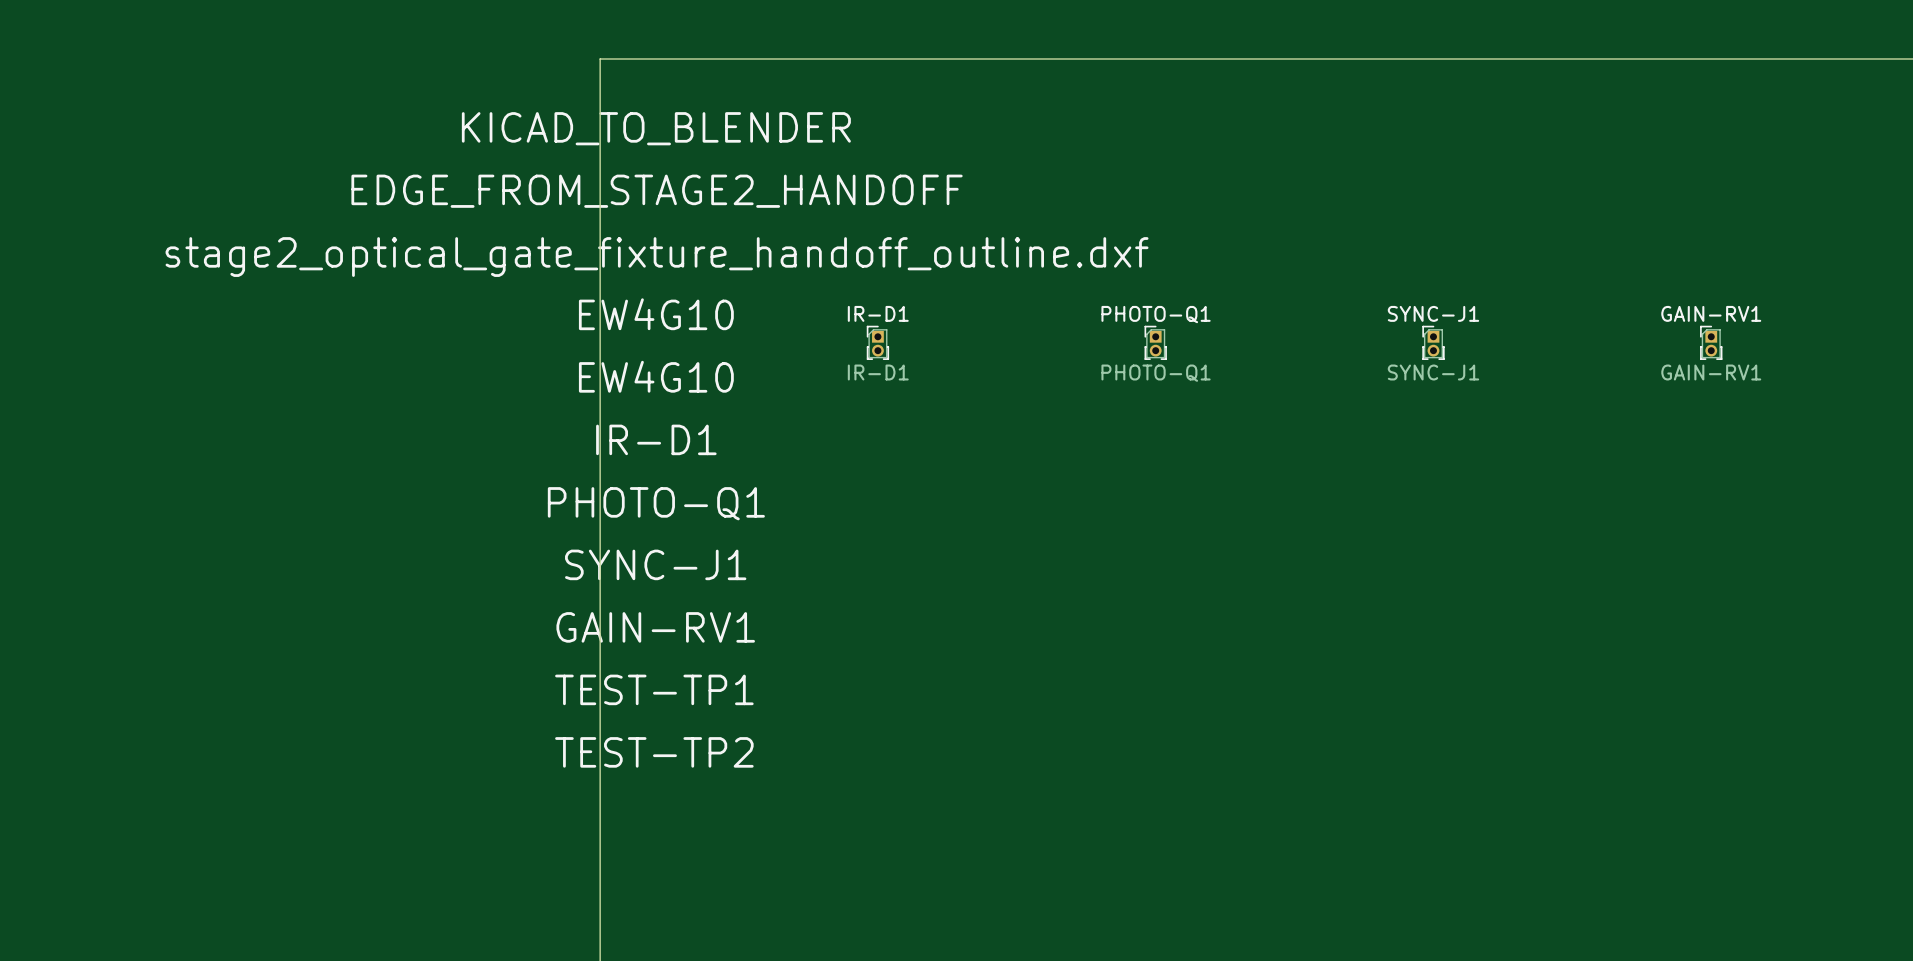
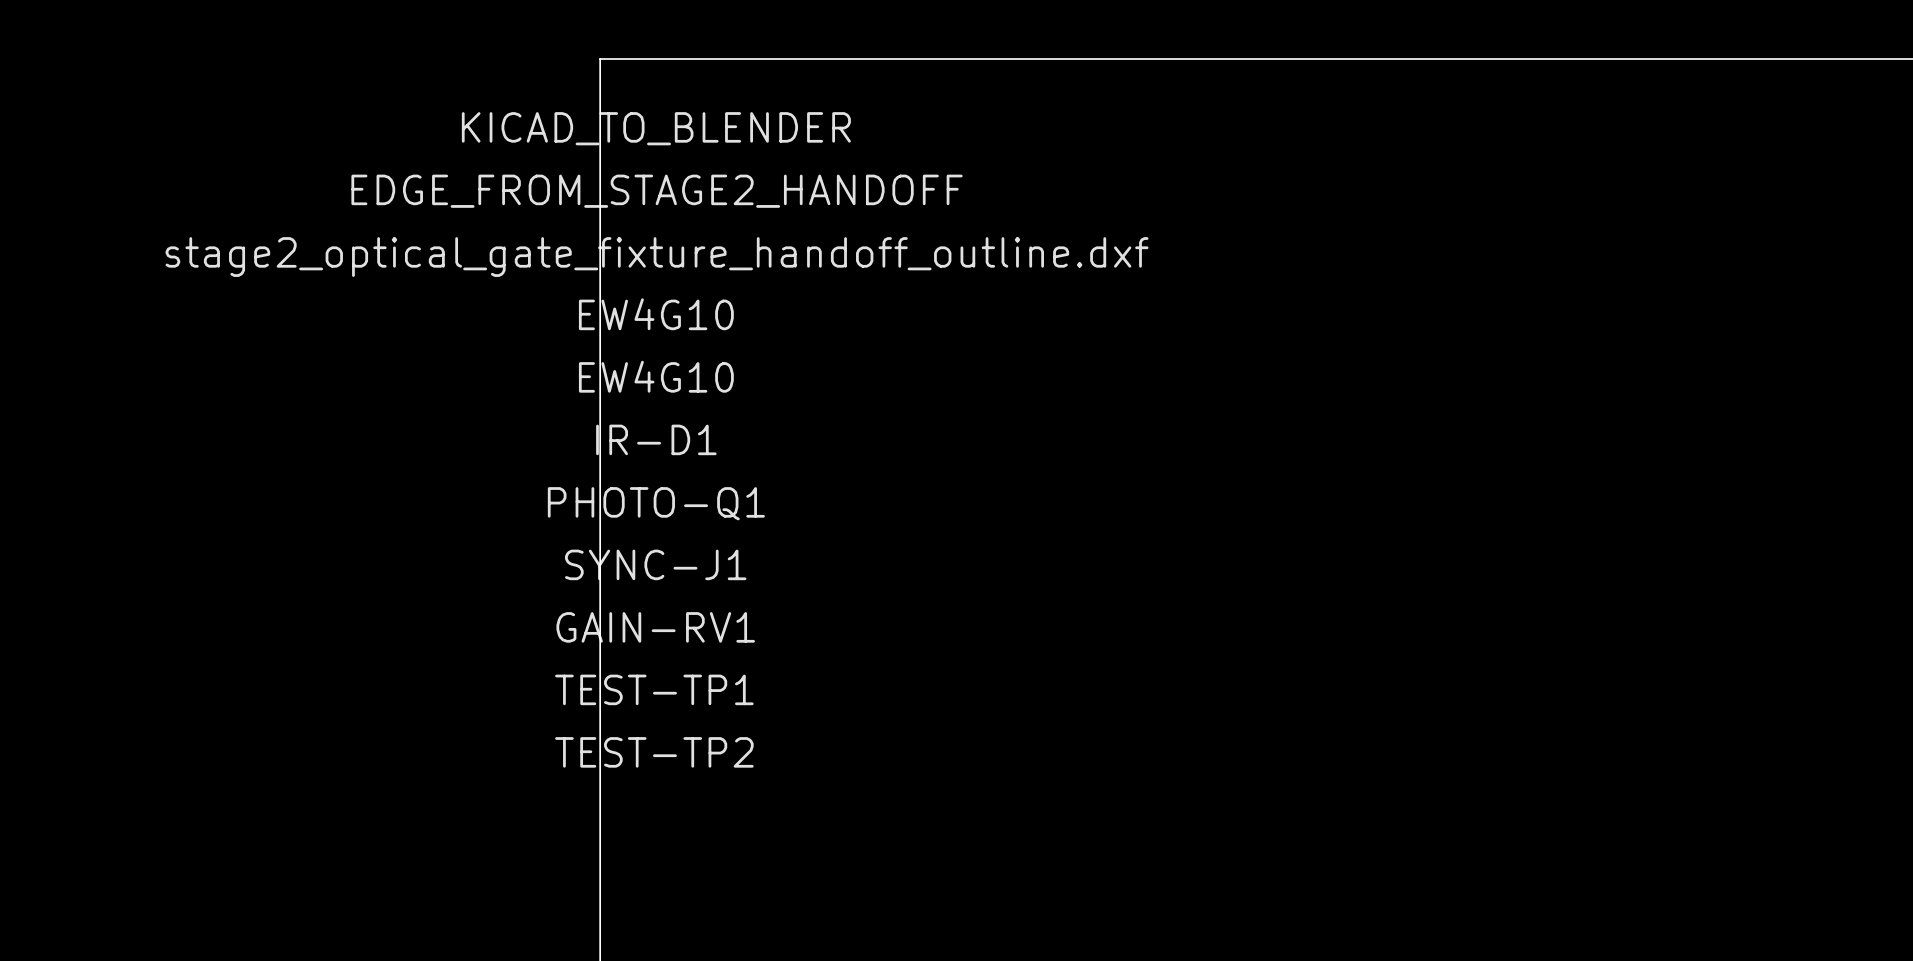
IR-D1: IR-D1 (877, 342) -> none
PHOTO-Q1: PHOTO-Q1 (1155, 342) -> none
SYNC-J1: SYNC-J1 (1433, 342) -> none
GAIN-RV1: GAIN-RV1 (1711, 342) -> none

